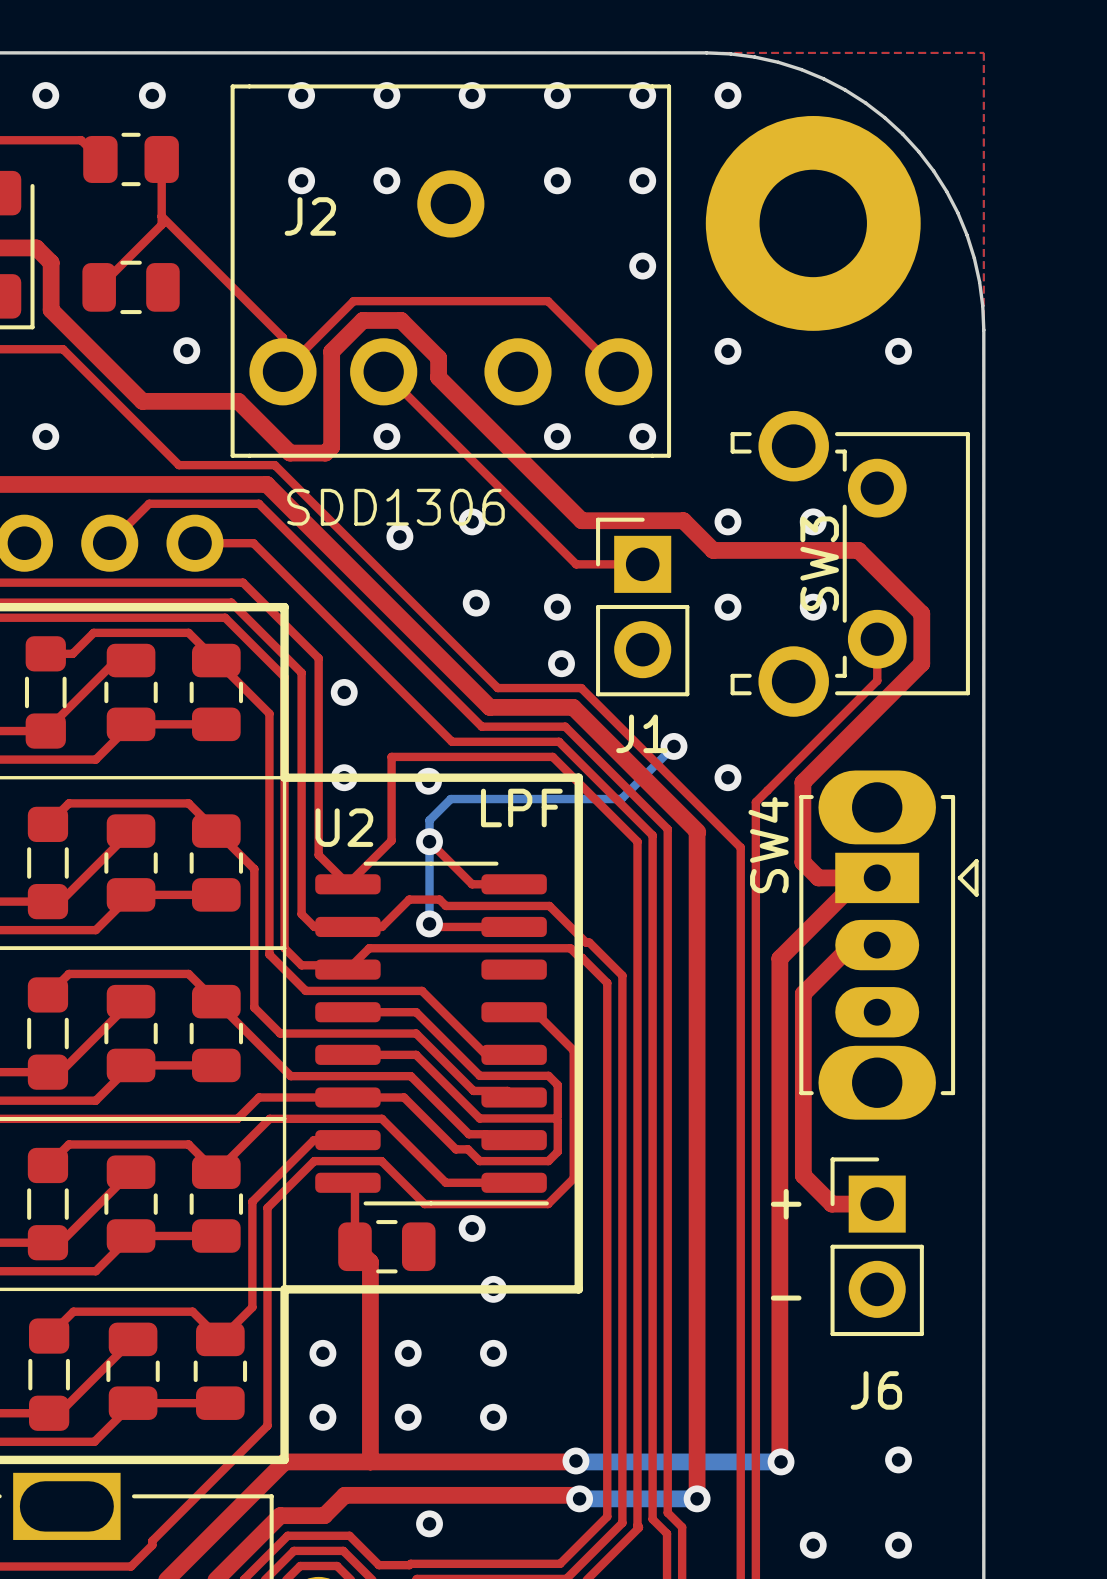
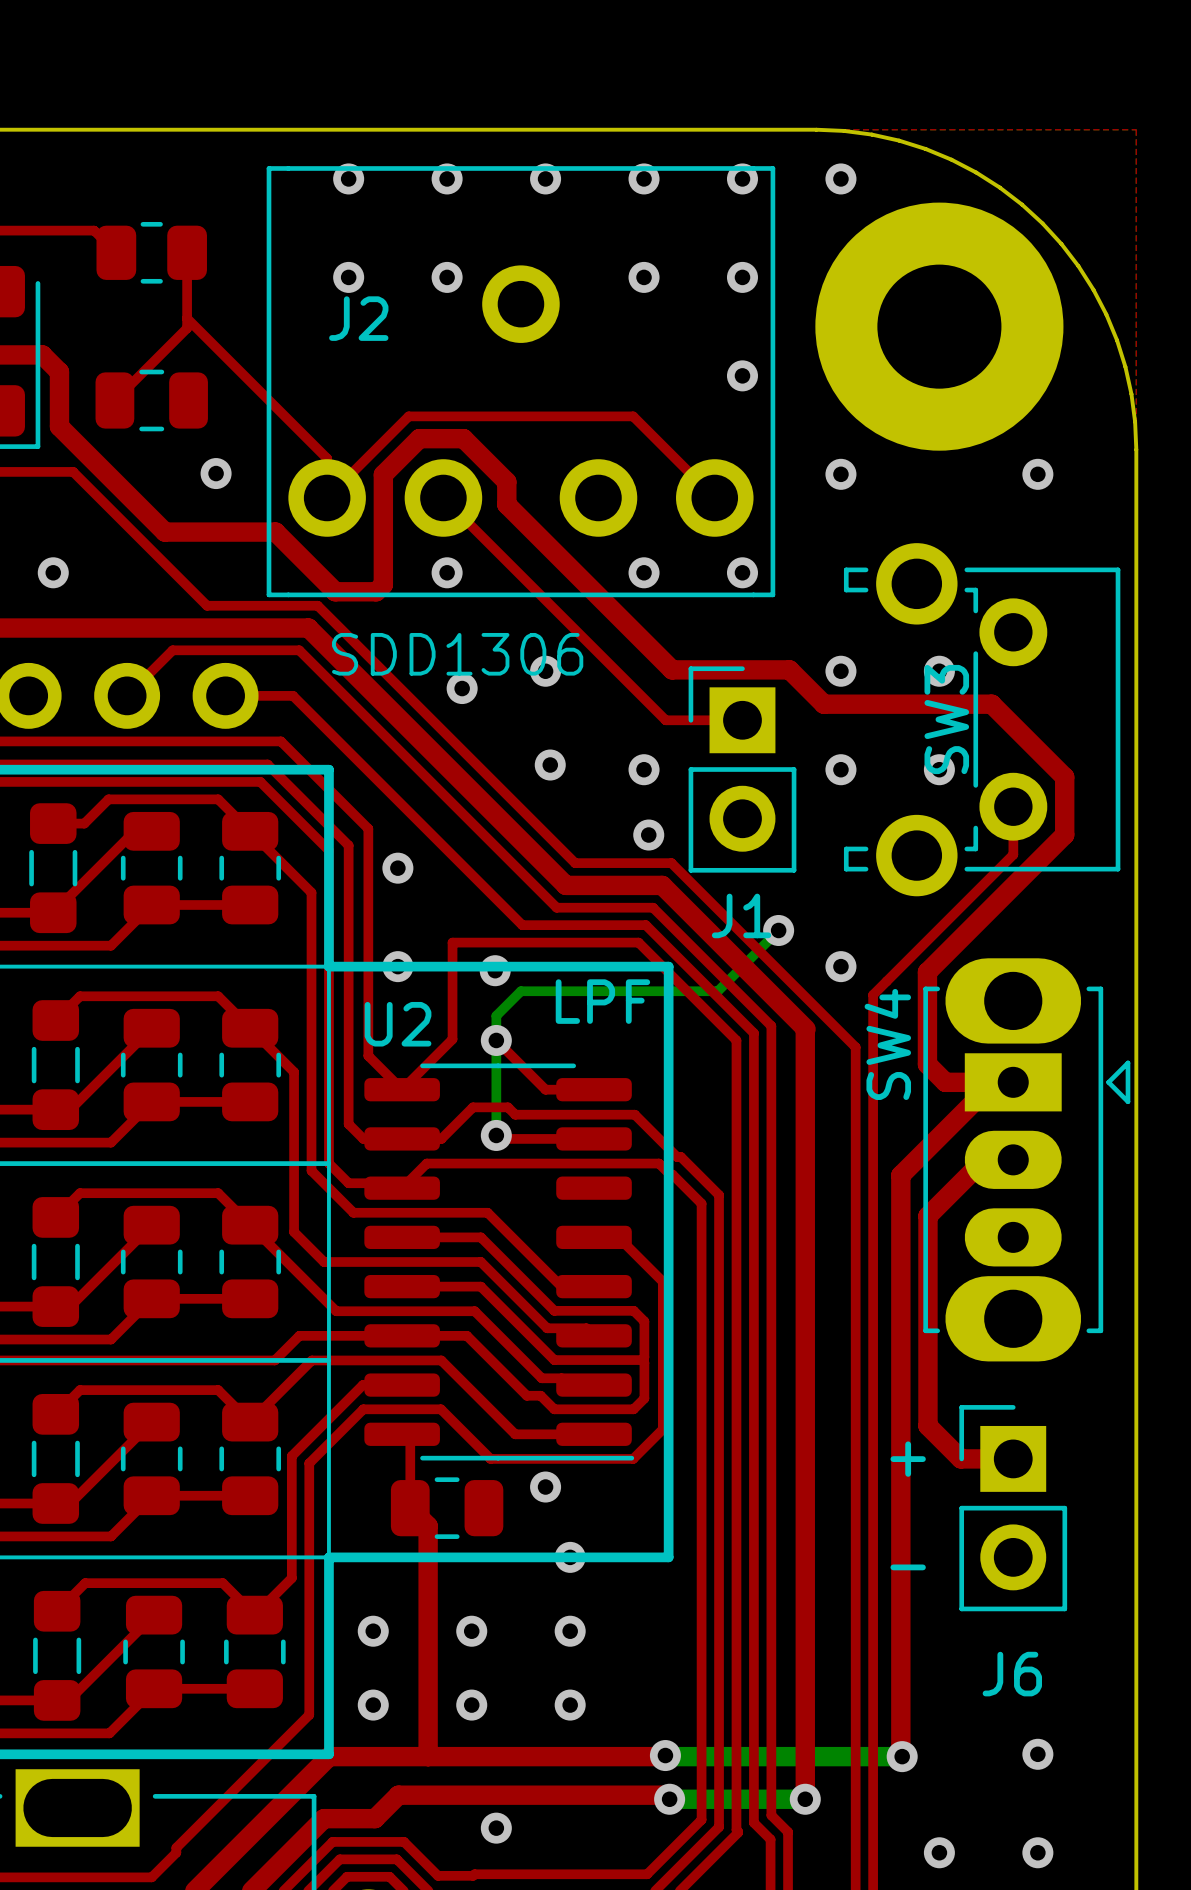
via: (45, 95) -> none
via: (152, 95) -> none

